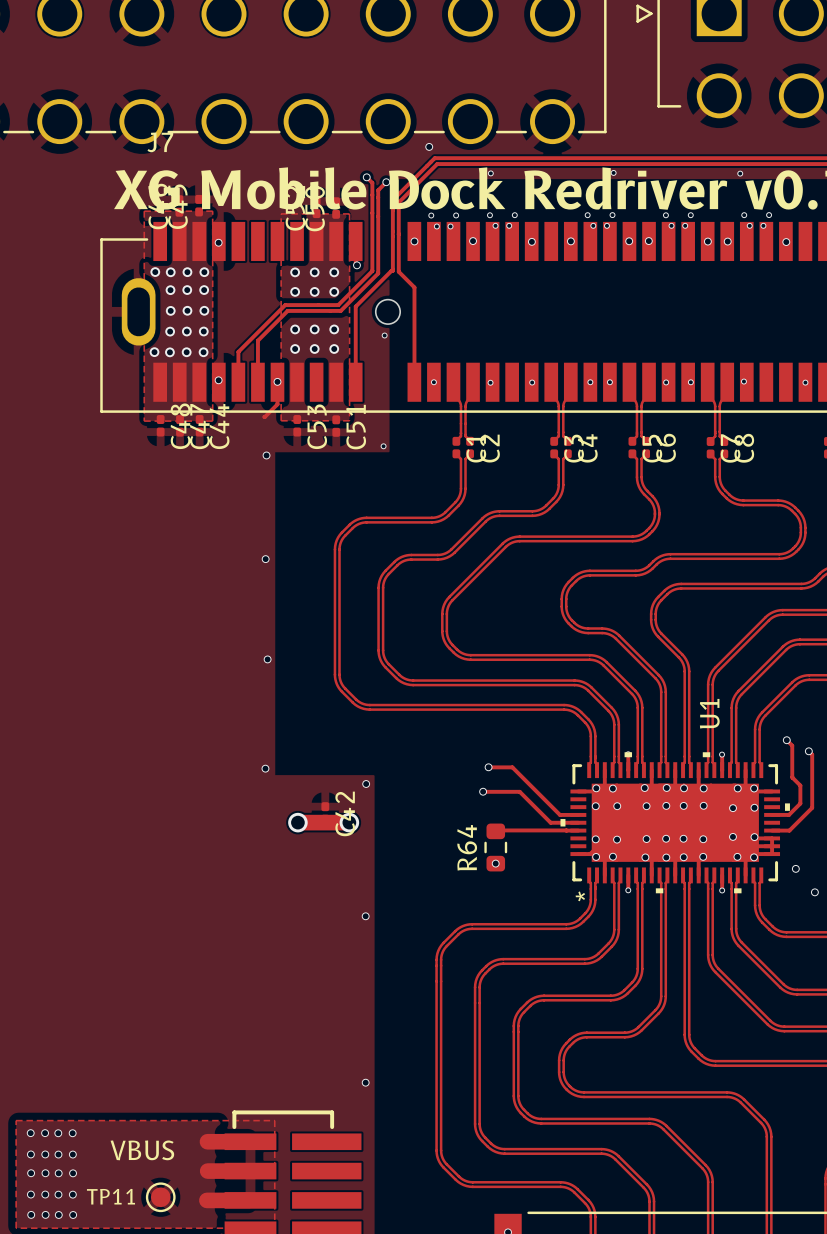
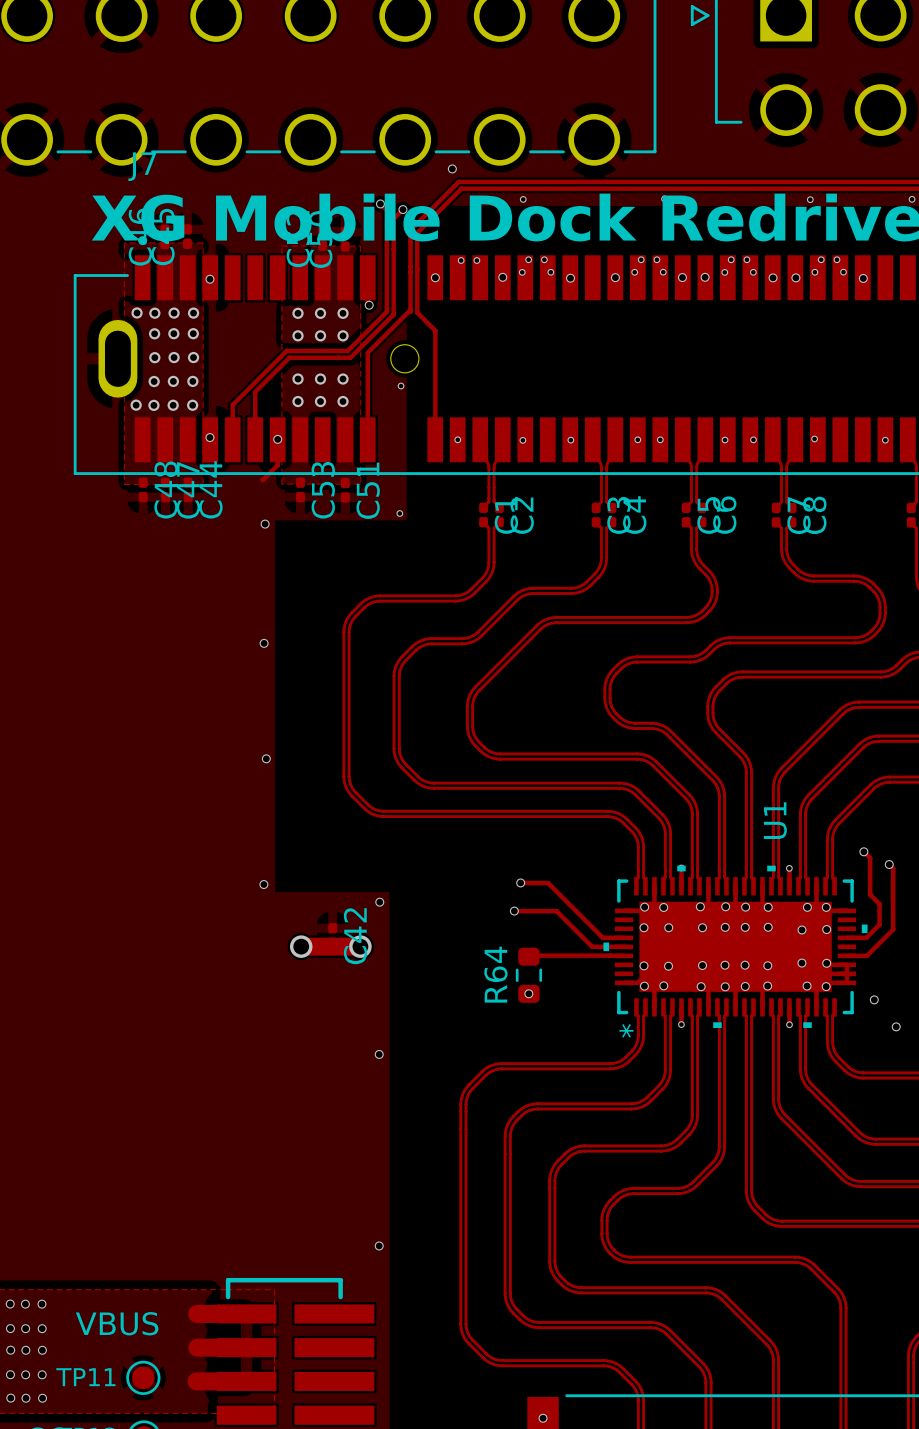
via: (431, 215) -> none
via: (456, 215) -> none
via: (489, 215) -> none
via: (514, 215) -> none
via: (587, 215) -> none
via: (612, 215) -> none
via: (665, 215) -> none
via: (690, 215) -> none
via: (744, 215) -> none
via: (769, 215) -> none
via: none -> (522, 272)
via: none -> (550, 272)
via: none -> (634, 272)
via: none -> (663, 272)
via: none -> (724, 272)
via: none -> (753, 272)
via: none -> (814, 272)
via: none -> (843, 272)

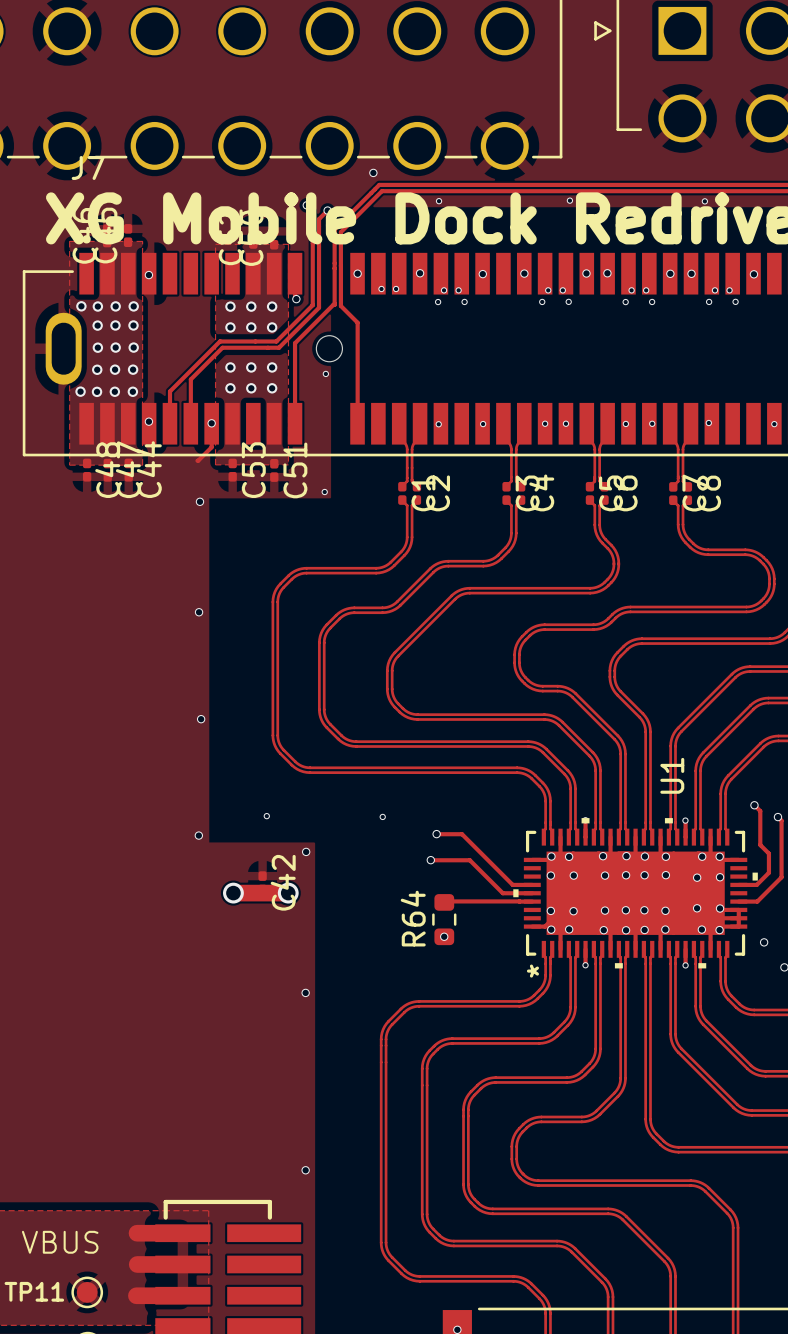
via: (528, 259) -> none
via: (544, 259) -> none
via: (641, 259) -> none
via: (656, 259) -> none
via: (731, 259) -> none
via: (746, 259) -> none
via: (821, 259) -> none
via: (836, 259) -> none
via: (461, 260) -> none
via: (476, 260) -> none
via: (522, 272) -> none
via: (550, 272) -> none
via: (634, 272) -> none
via: (663, 272) -> none
via: (724, 272) -> none
via: (753, 272) -> none
via: (814, 272) -> none
via: (843, 272) -> none
via: none -> (381, 288)
via: none -> (396, 288)
via: none -> (444, 290)
via: none -> (458, 290)
via: none -> (548, 290)
via: none -> (562, 290)
via: none -> (631, 290)
via: none -> (646, 290)
via: none -> (714, 290)
via: none -> (729, 290)
via: none -> (438, 302)
via: none -> (464, 301)
via: none -> (542, 301)
via: none -> (568, 301)
via: none -> (625, 302)
via: none -> (652, 301)
via: none -> (709, 301)
via: none -> (735, 301)
via: (457, 439) -> none
via: none -> (266, 816)
via: none -> (382, 816)

